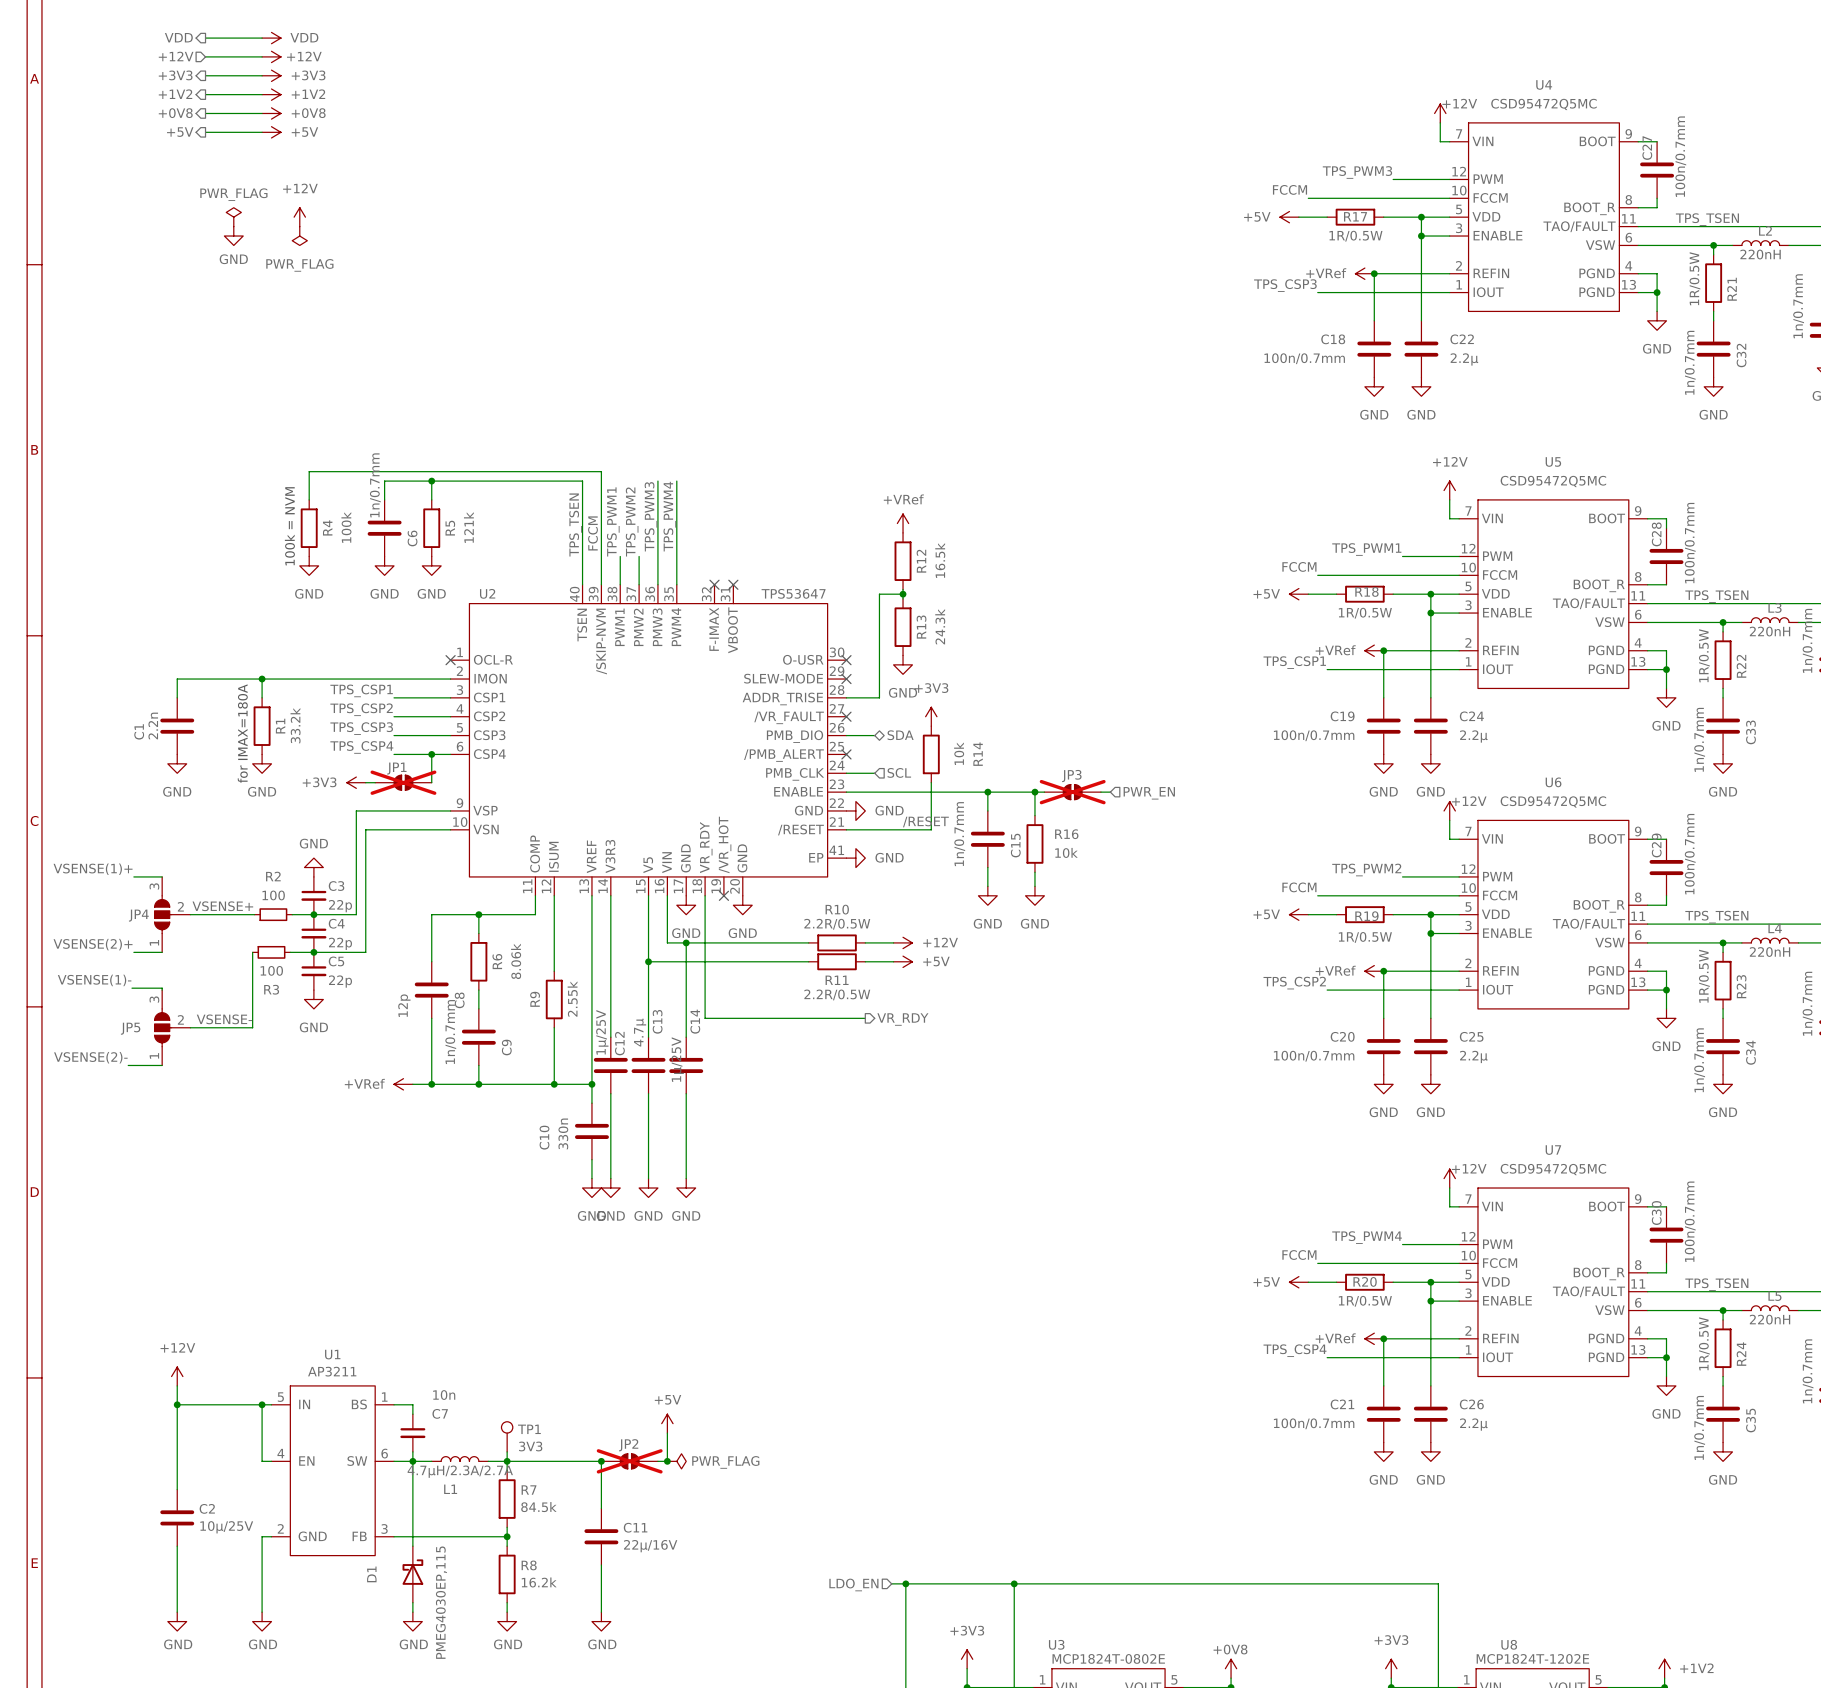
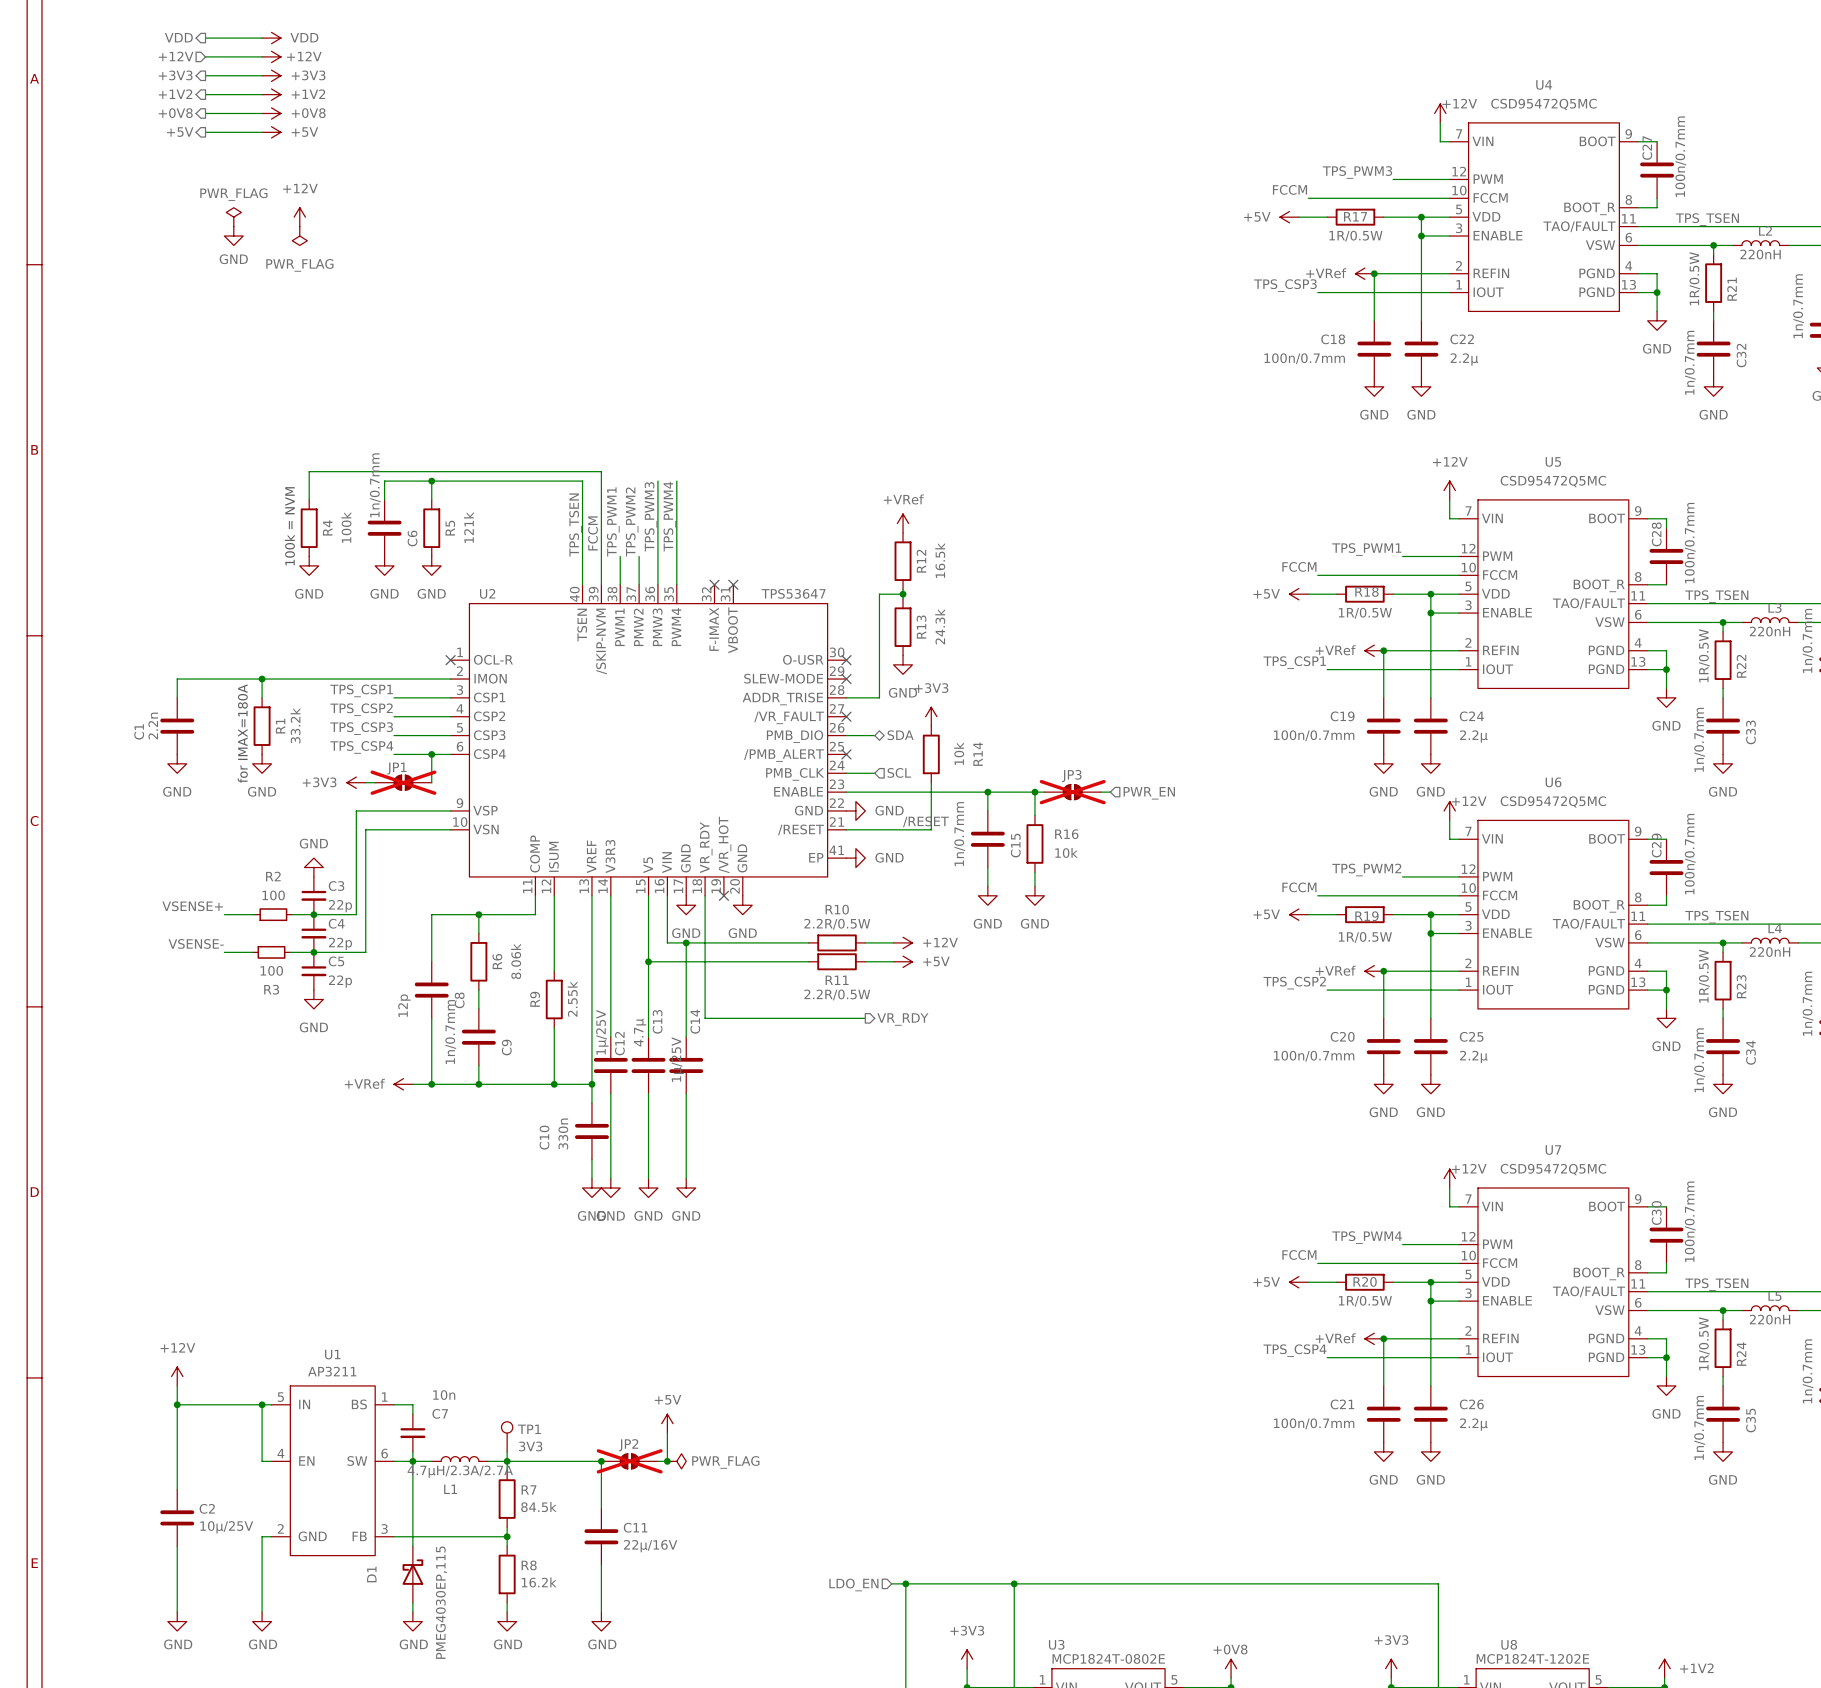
label: VSENSE(1)+ (93, 869) -> none
wire: (133, 876) (162, 876) -> none
label position: VSENSE+ (222, 906) -> VSENSE+ (192, 906)
JP4: (172, 914) -> none
wire: (190, 914) (224, 914) -> none
label: VSENSE(2)+ (93, 944) -> none
wire: (133, 952) (162, 952) -> none
wire: (252, 952) (252, 1027) (190, 1027) -> (252, 952) (224, 952)
label: VSENSE(1)- (94, 980) -> none
wire: (132, 988) (162, 988) (162, 990) -> none
label position: VSENSE- (224, 1019) -> VSENSE- (196, 943)
JP5: (172, 1027) -> none
label: VSENSE(2)- (90, 1057) -> none
wire: (128, 1065) (162, 1065) -> none

